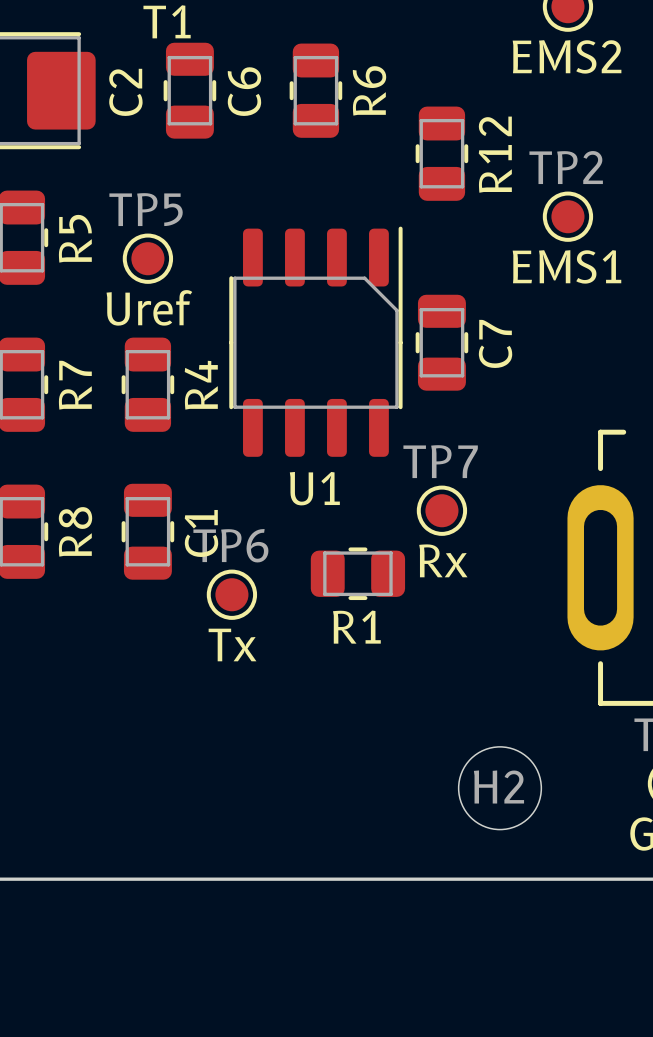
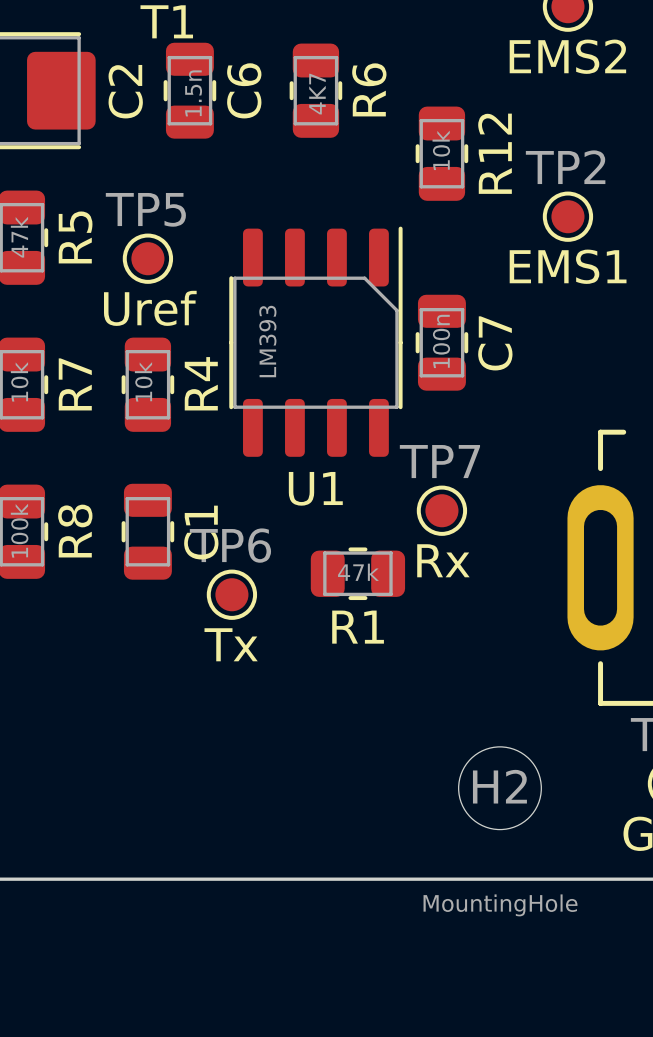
C6 value: none -> 1.5n (193, 93)
R6 value: none -> 4K7 (317, 94)
R12 value: none -> 10k (441, 150)
R5 value: none -> 47k (19, 237)
C7 value: none -> 100n (441, 341)
U1 value: none -> LM393 (267, 341)
R7 value: none -> 10k (19, 381)
R4 value: none -> 10k (143, 381)
R8 value: none -> 100k (19, 530)
R1 value: none -> 47k (358, 572)
H2 value: none -> MountingHole (500, 905)

